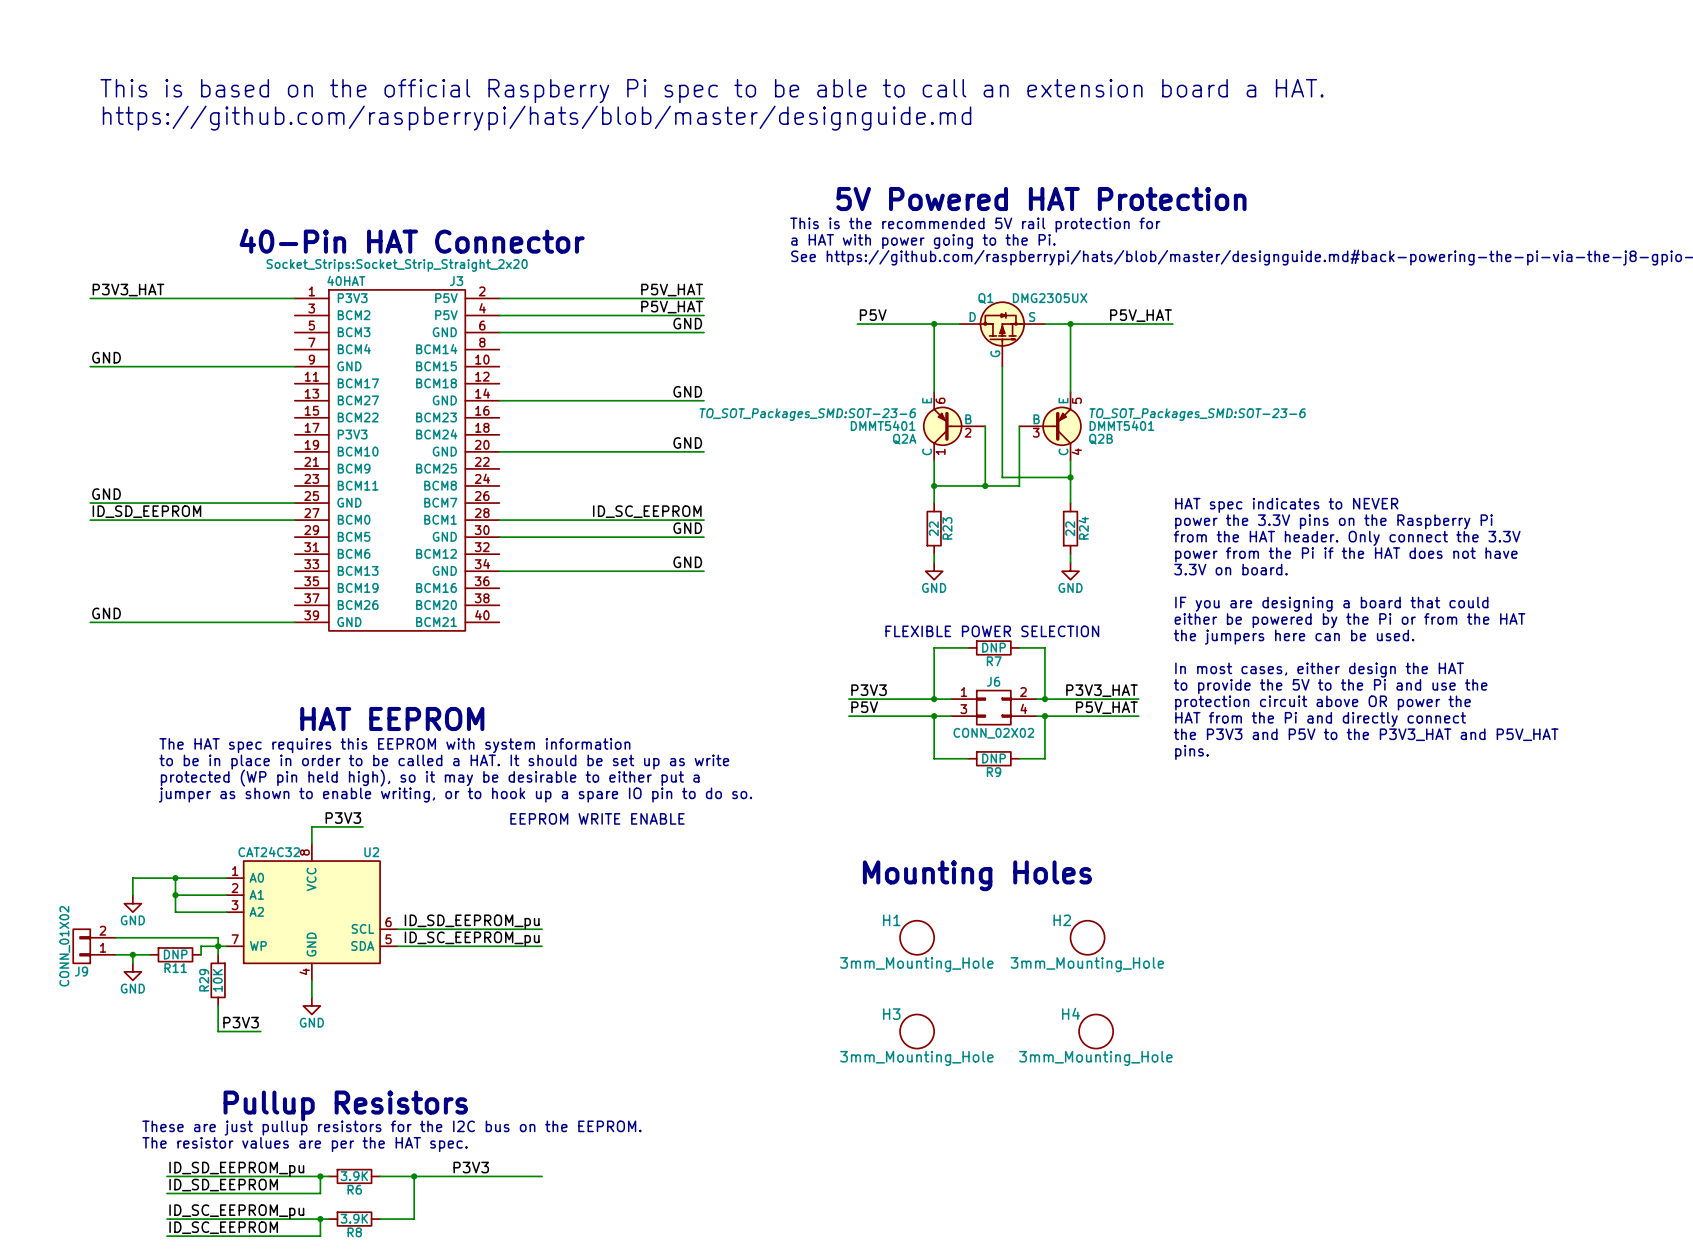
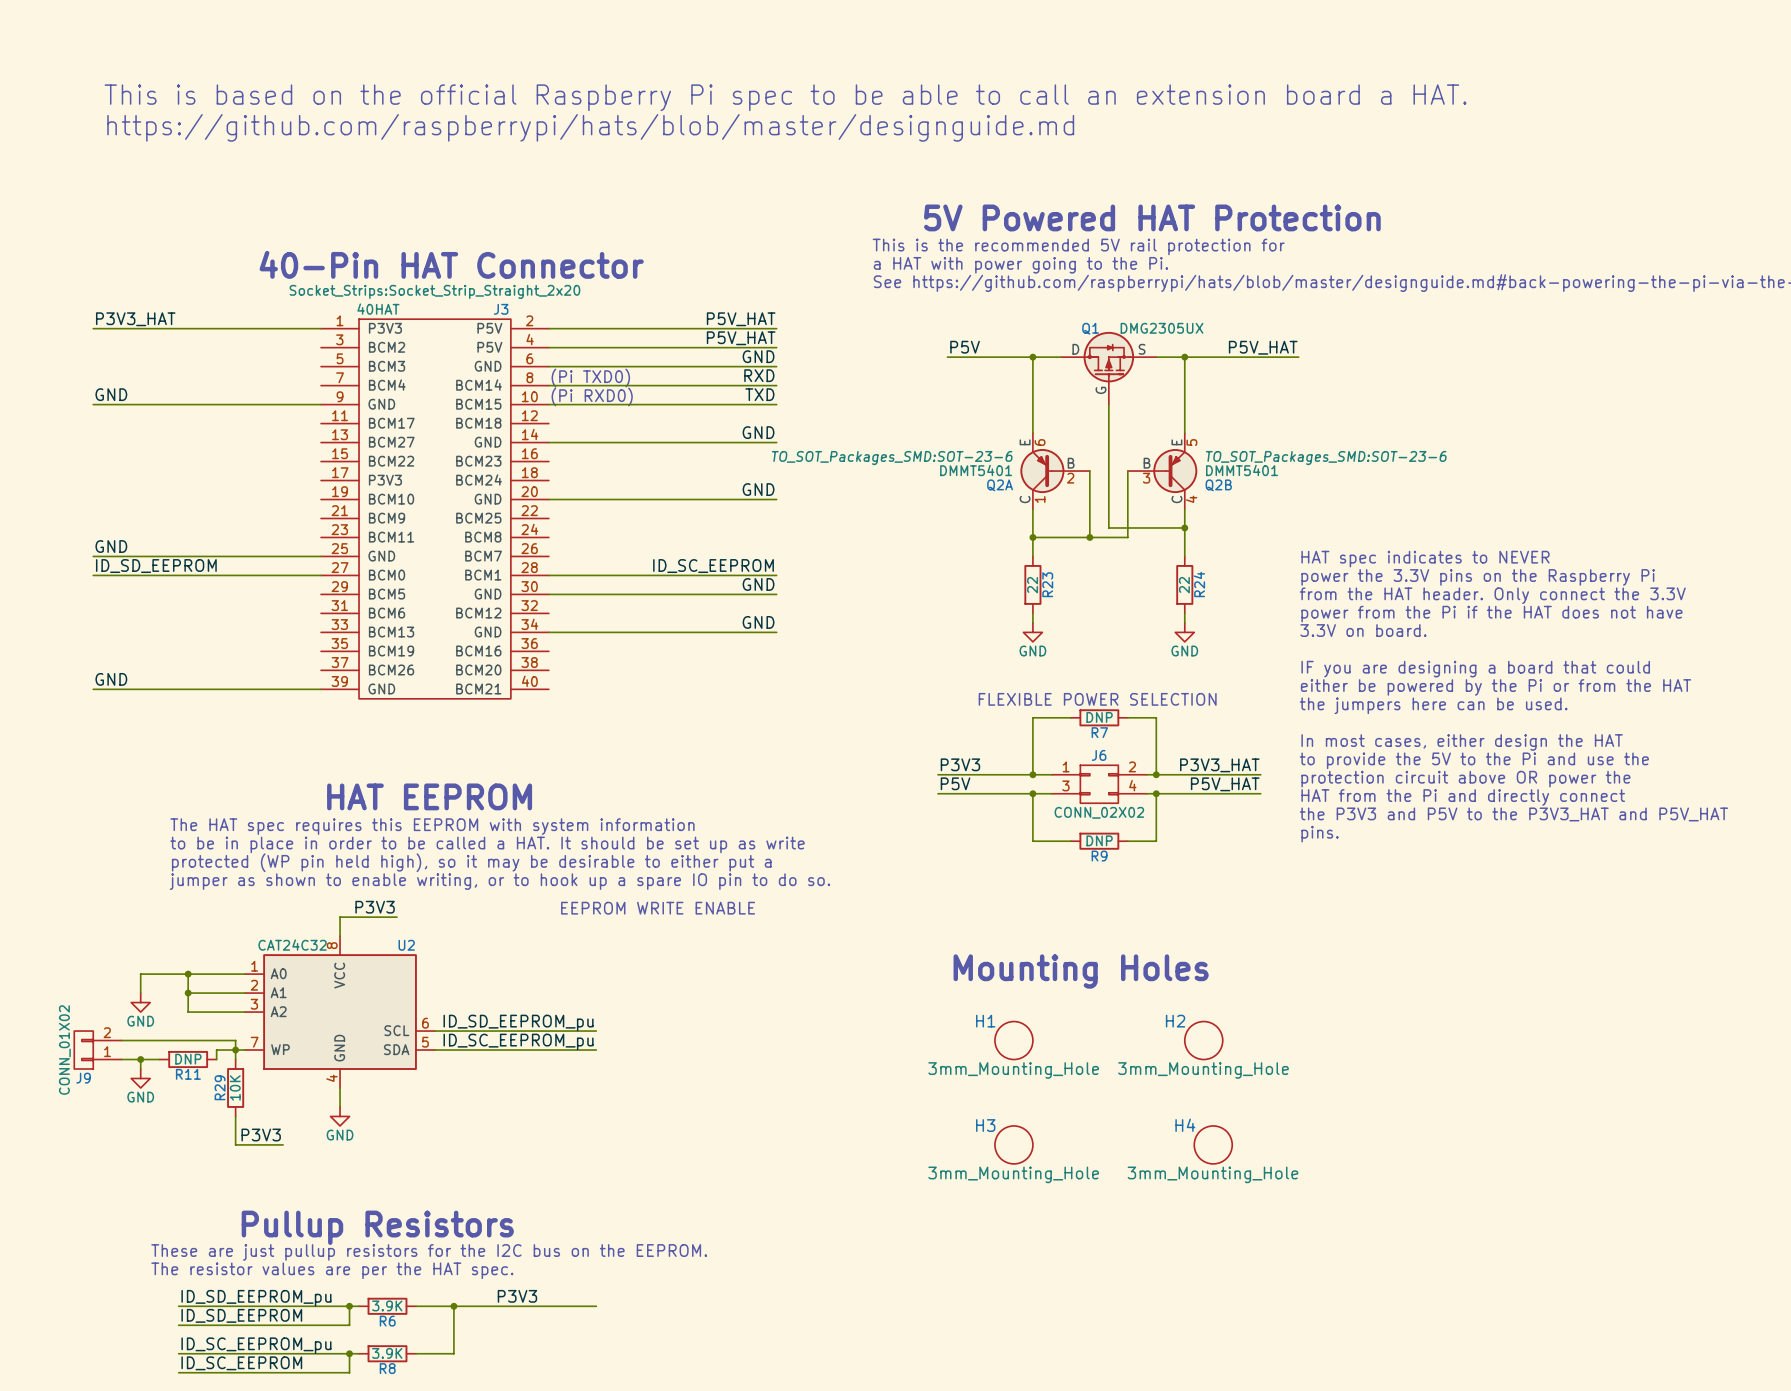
label: none -> RXD (759, 375)
text: none -> (Pi TXD0) (590, 378)
wire: none -> (548, 385) (776, 385)
label: none -> TXD (759, 394)
text: none -> (Pi RXD0) (592, 396)
wire: none -> (548, 404) (776, 404)

